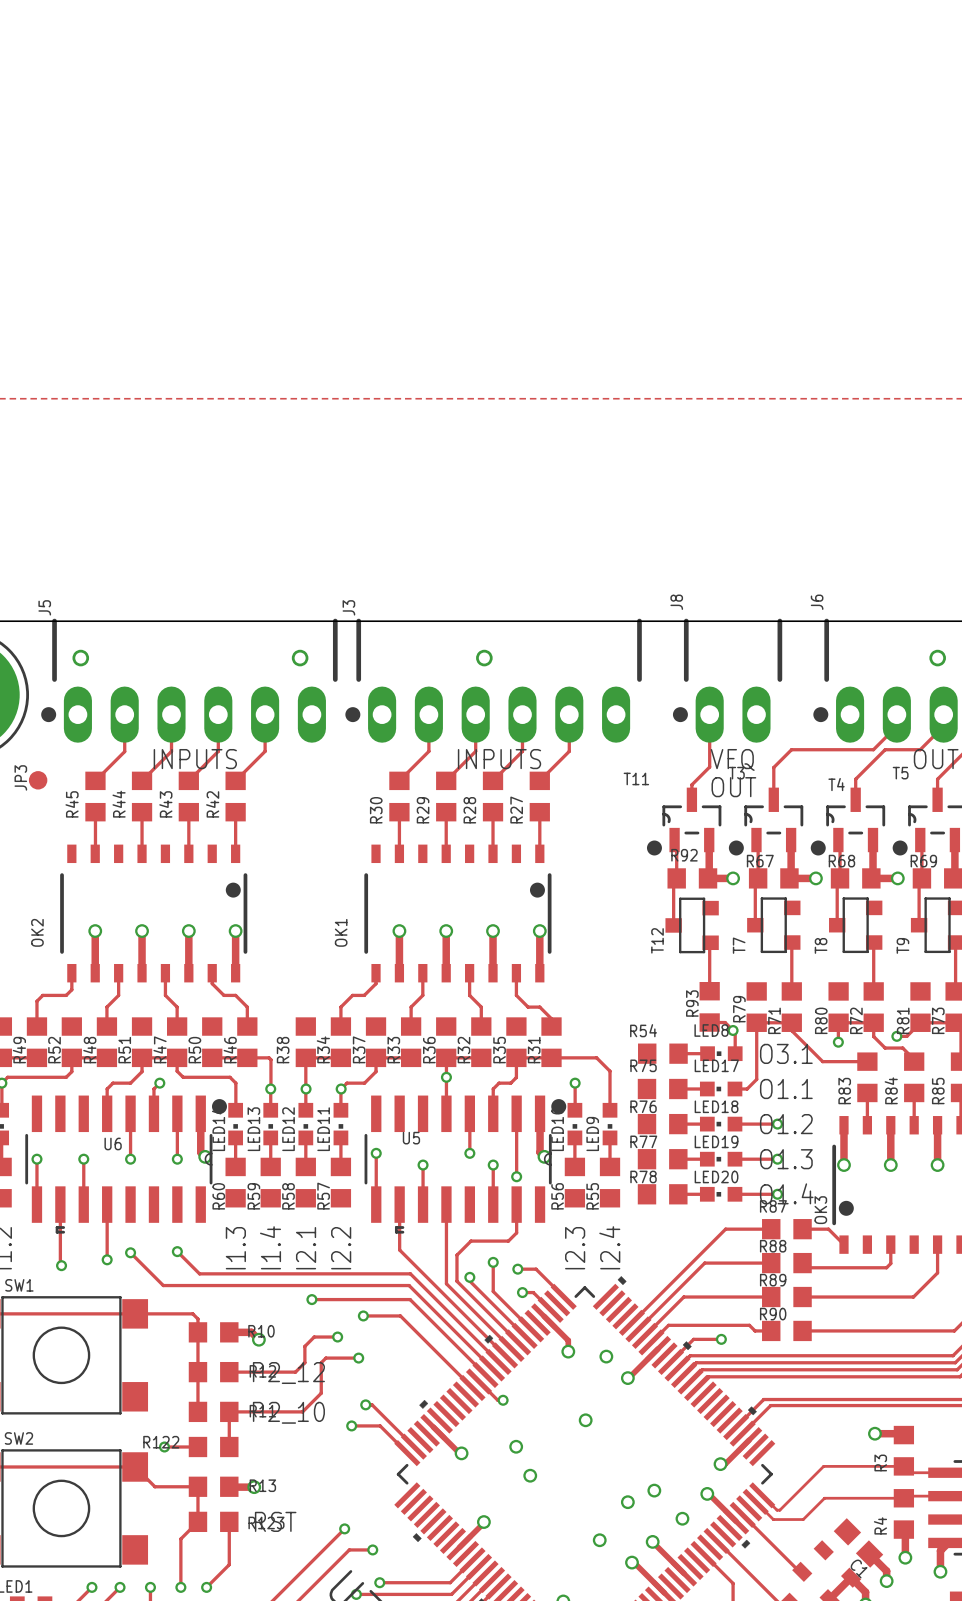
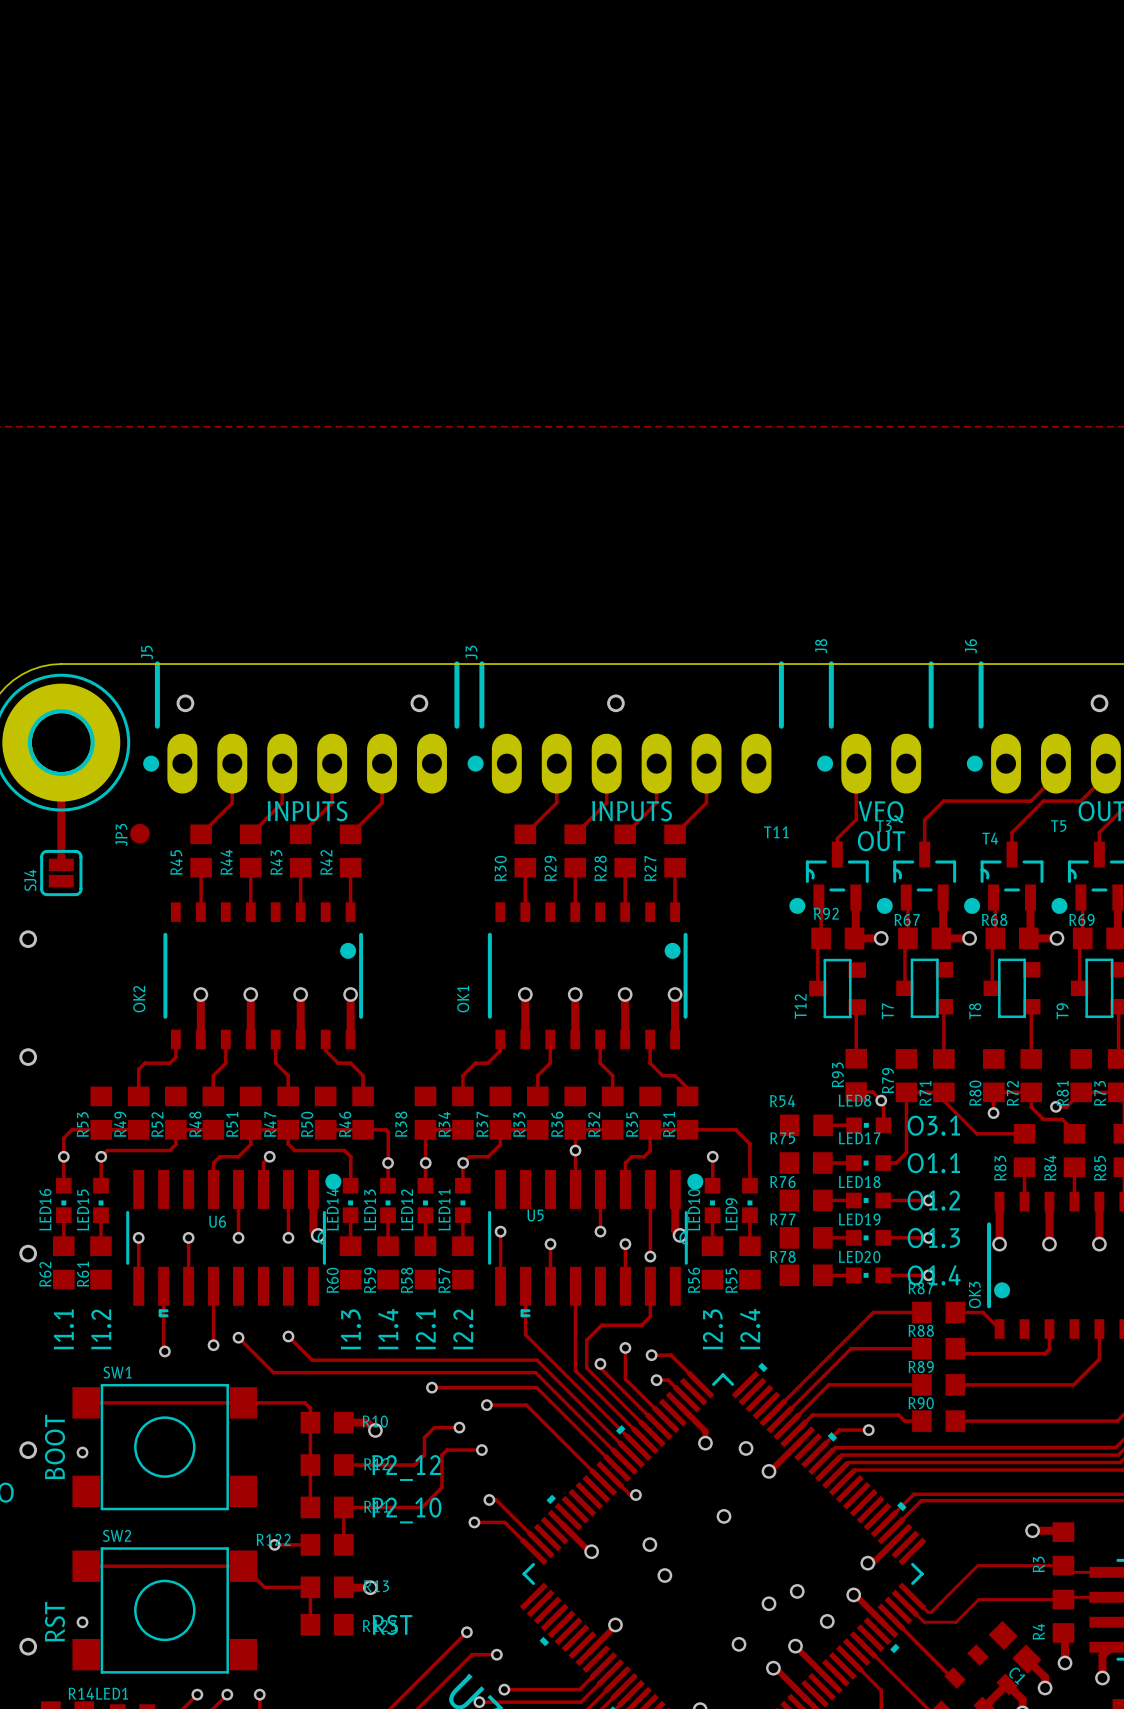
track: (197, 1521) (180, 1538) (180, 1587) -> none
track: (229, 1521) (229, 1564) (206, 1587) -> none
via: (180, 1587) -> none
via: (206, 1587) -> none

